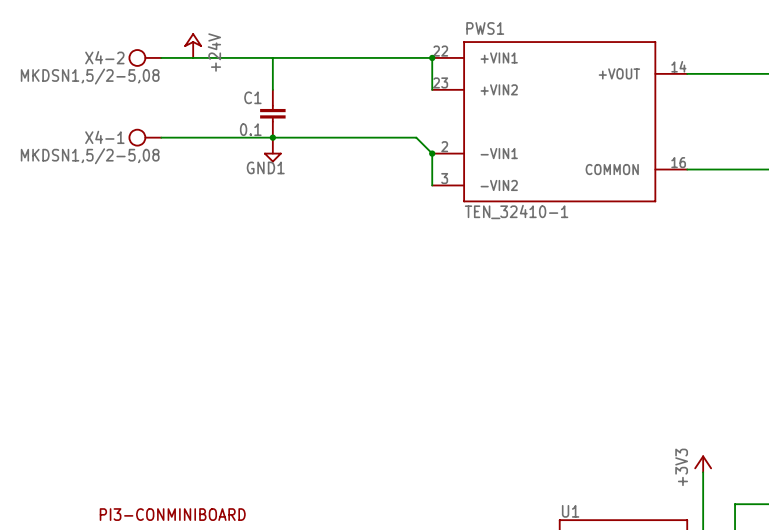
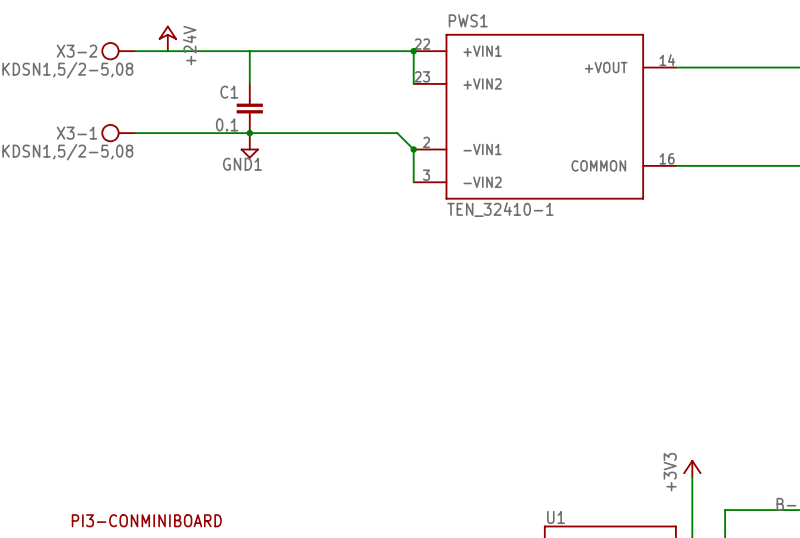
X4-2 name: X4-2 (104, 57) -> X3-2 (77, 51)
X4-1 name: X4-1 (104, 137) -> X3-1 (77, 133)

